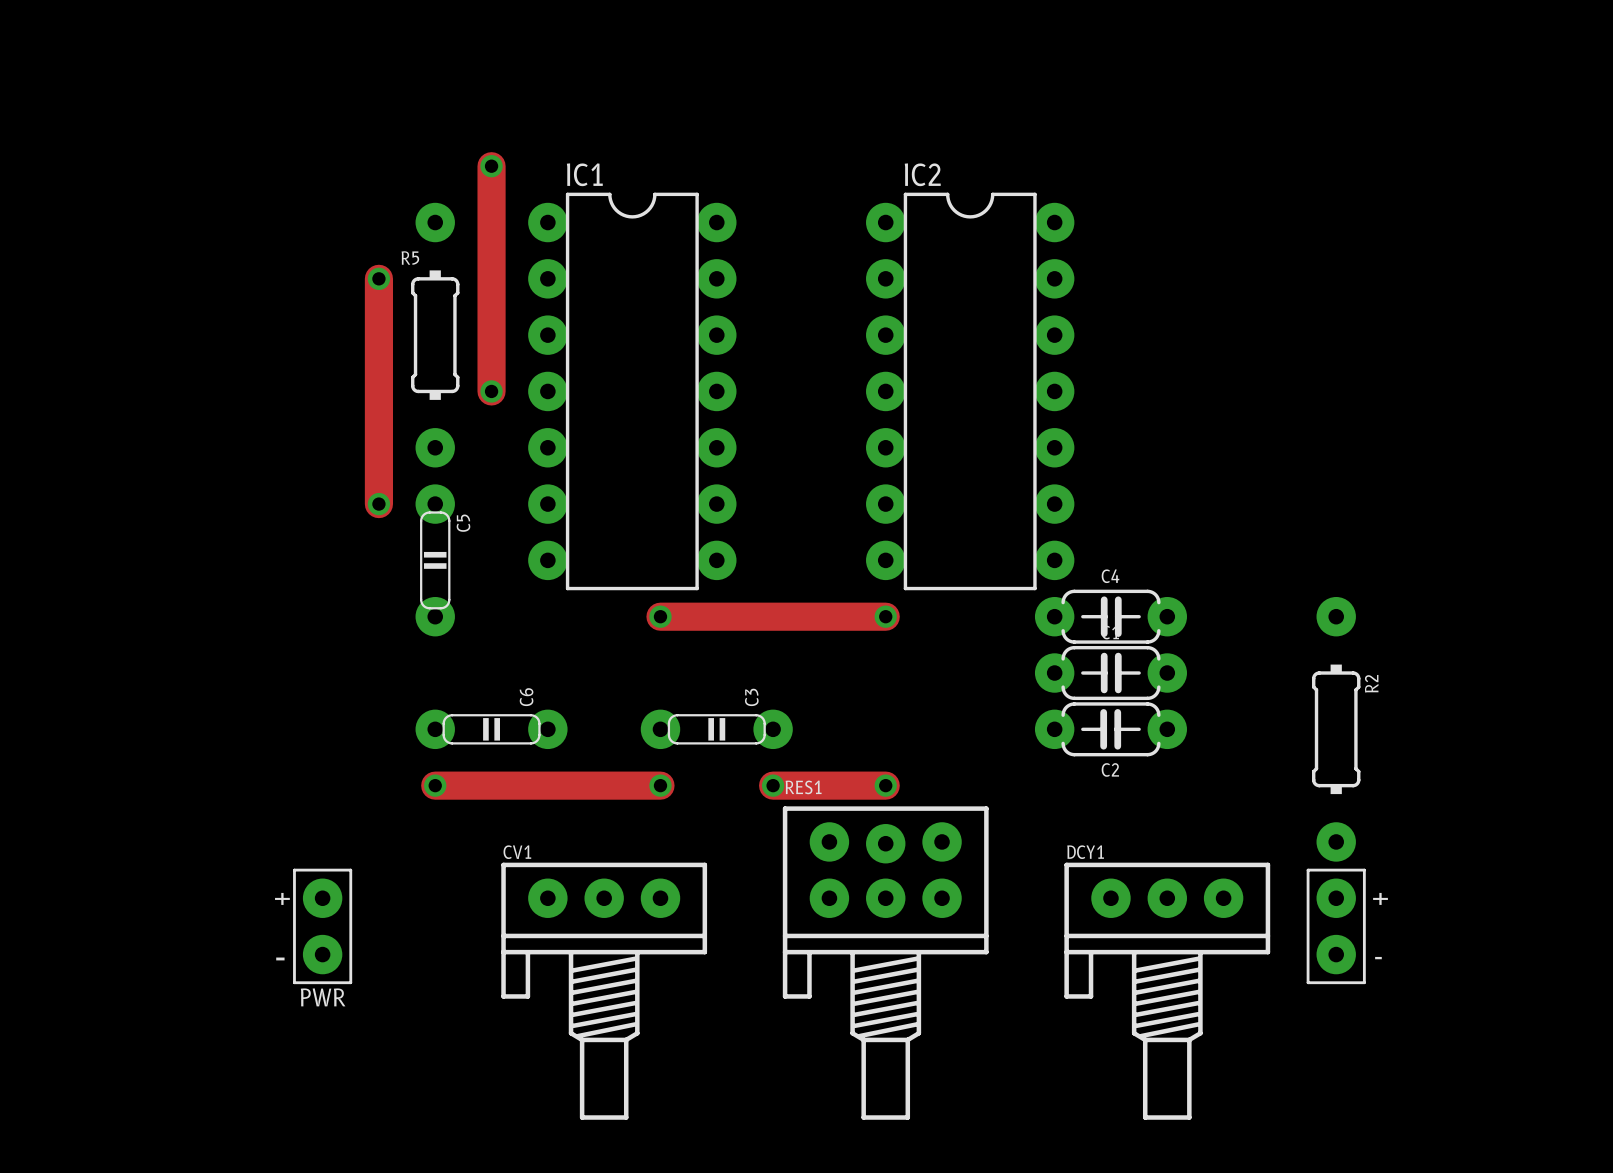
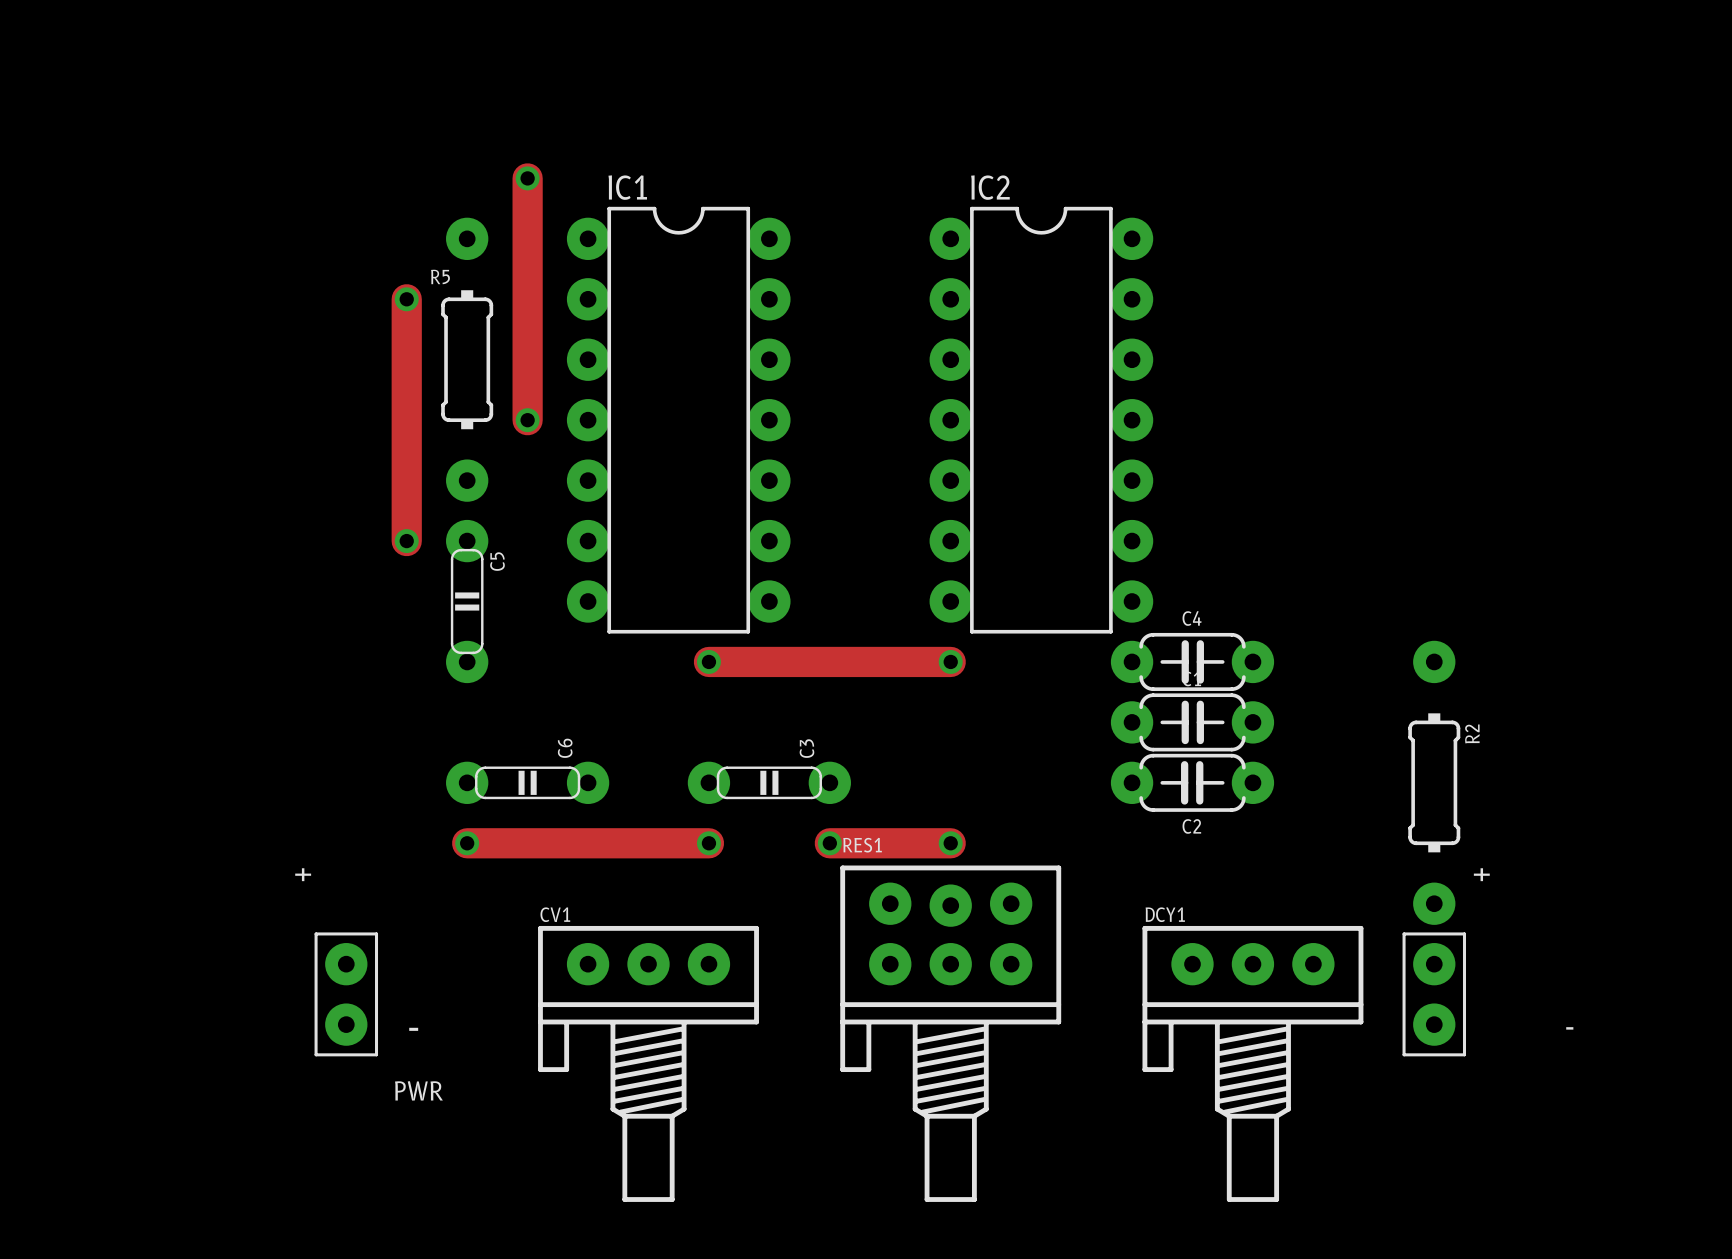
part footprint: [293, 868, 353, 985] -> [314, 932, 379, 1057]
part footprint: [1306, 868, 1366, 985] -> [1402, 932, 1467, 1057]

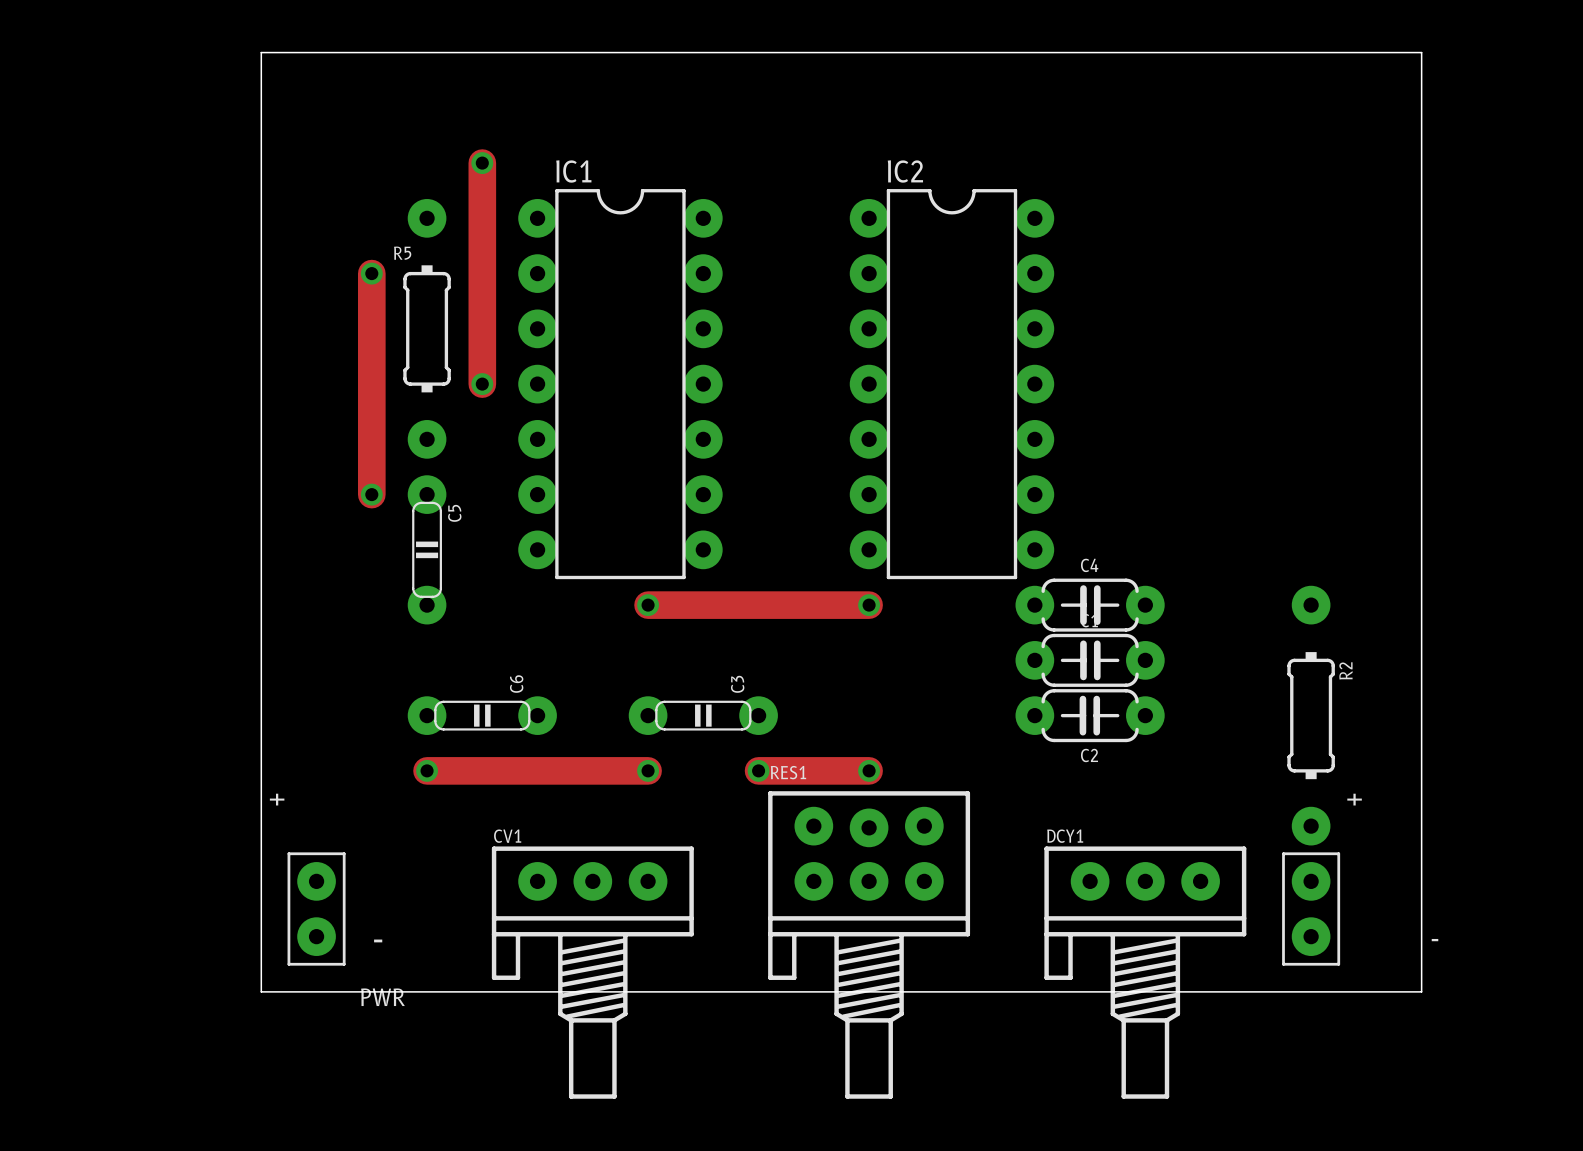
board edge: none -> (261, 52) (1421, 52) (1421, 991) (261, 991) (261, 52)

